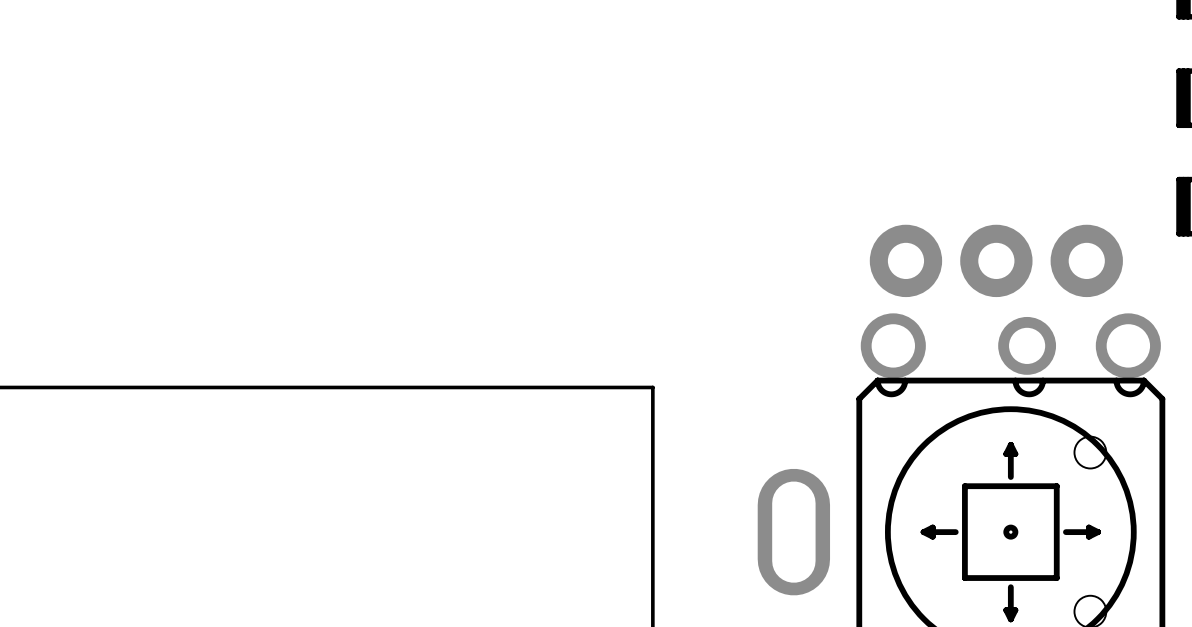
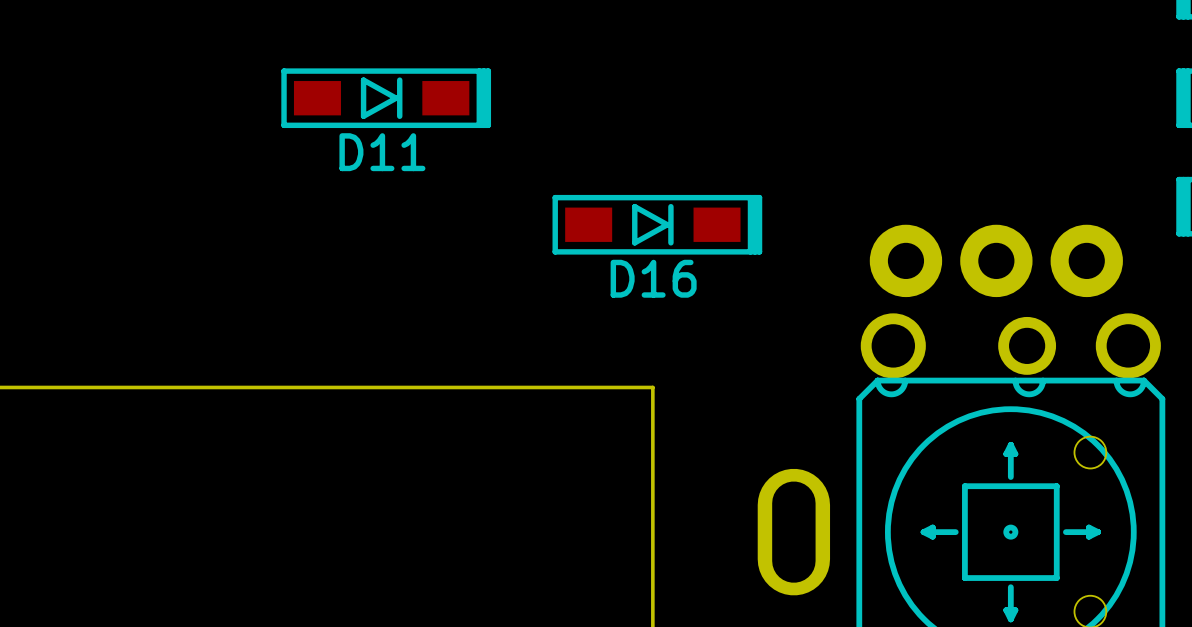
D11: none -> (386, 98)
D16: none -> (657, 224)

